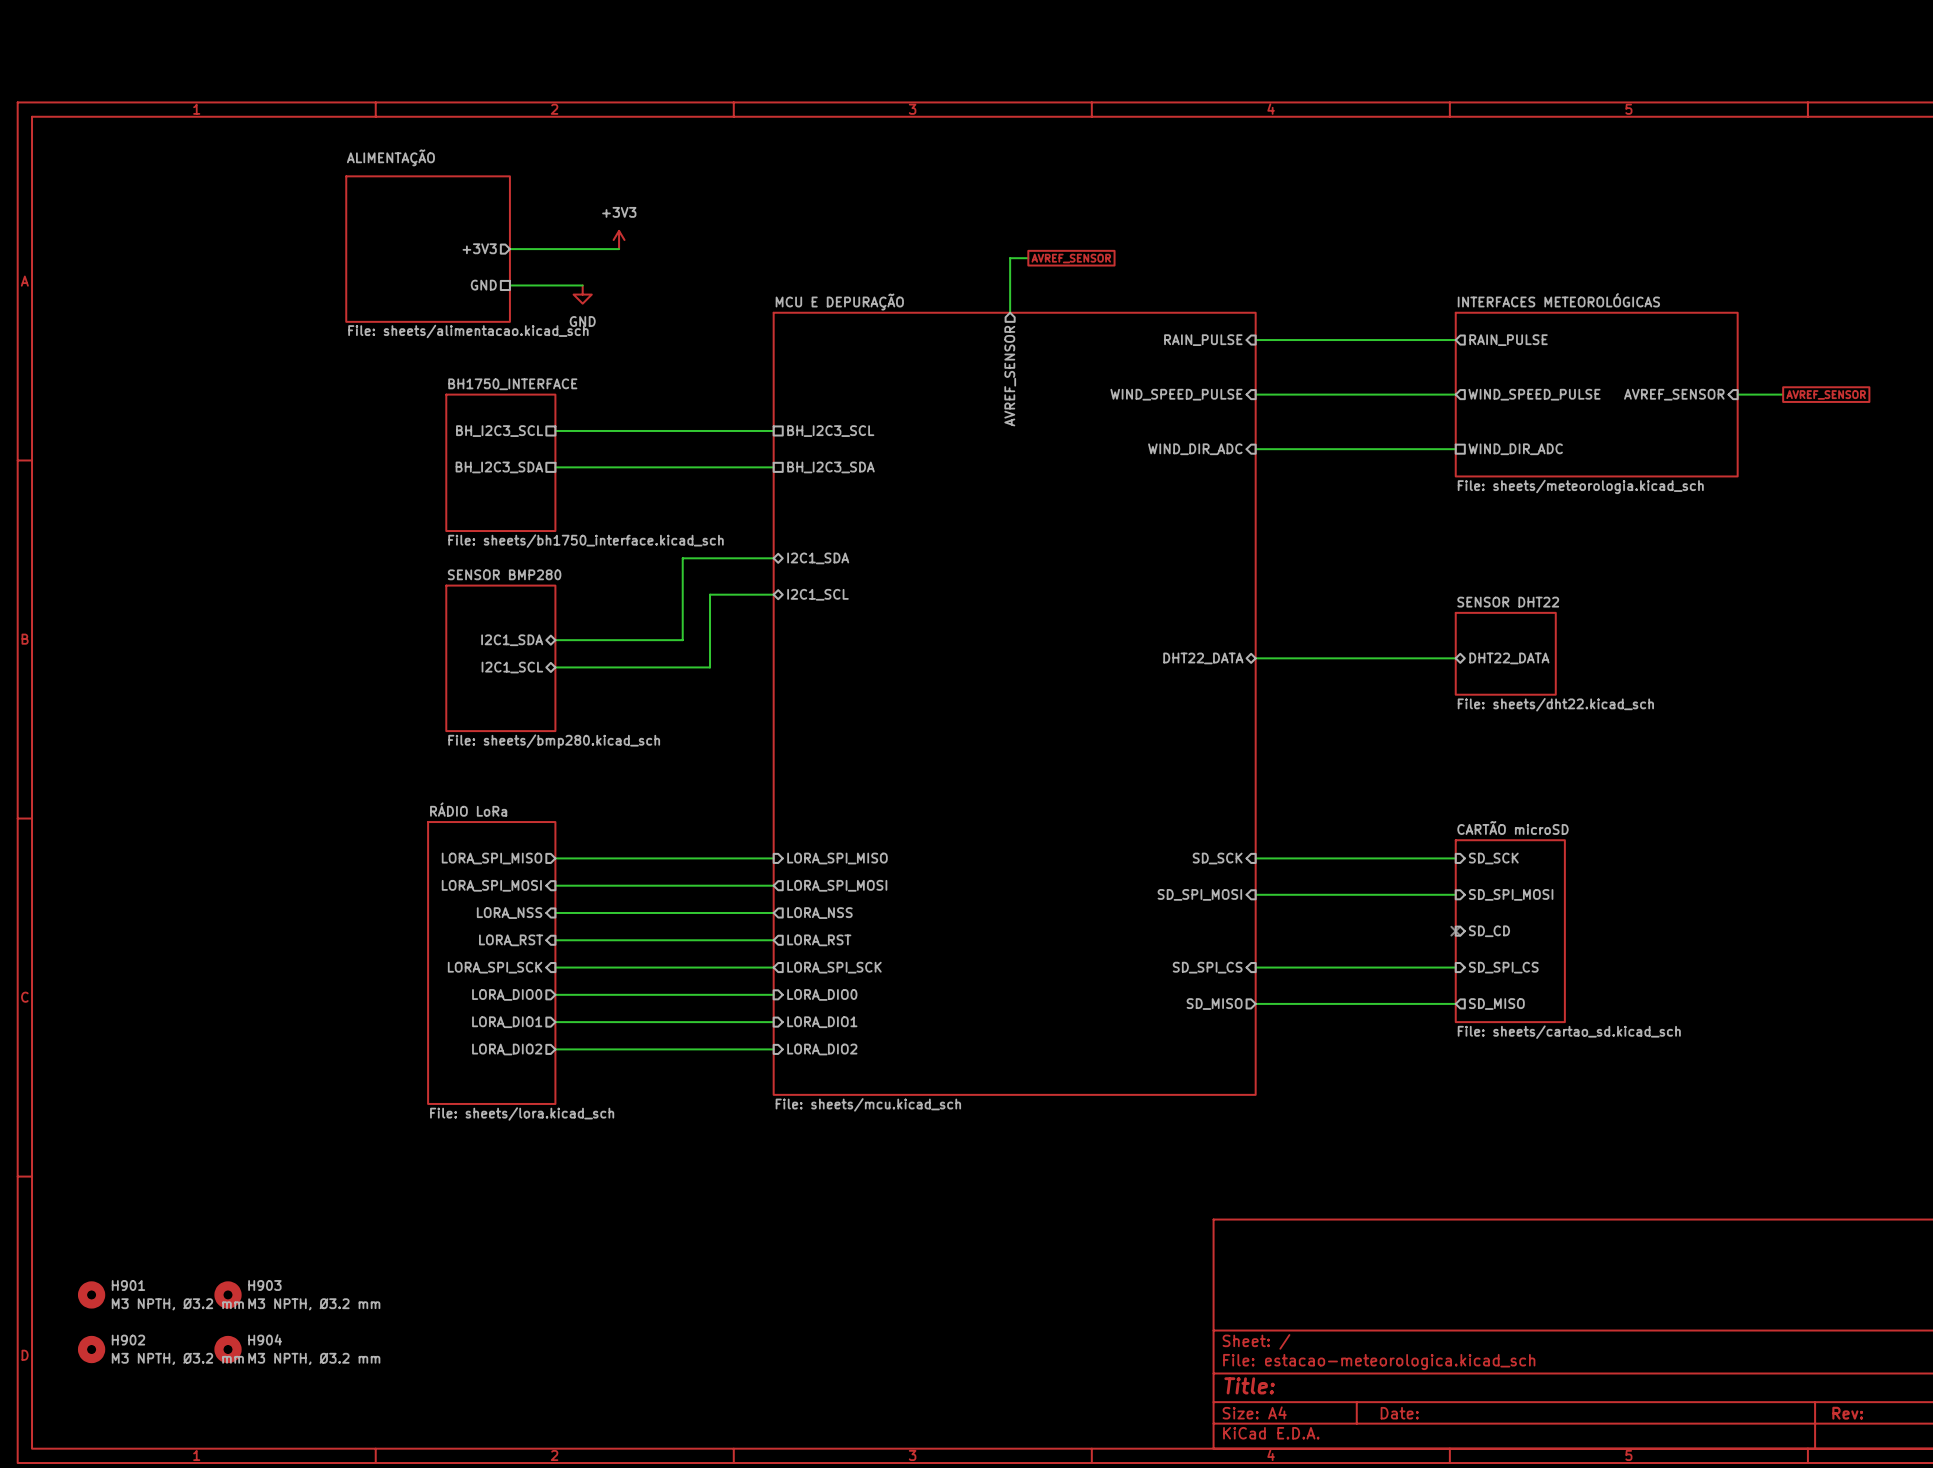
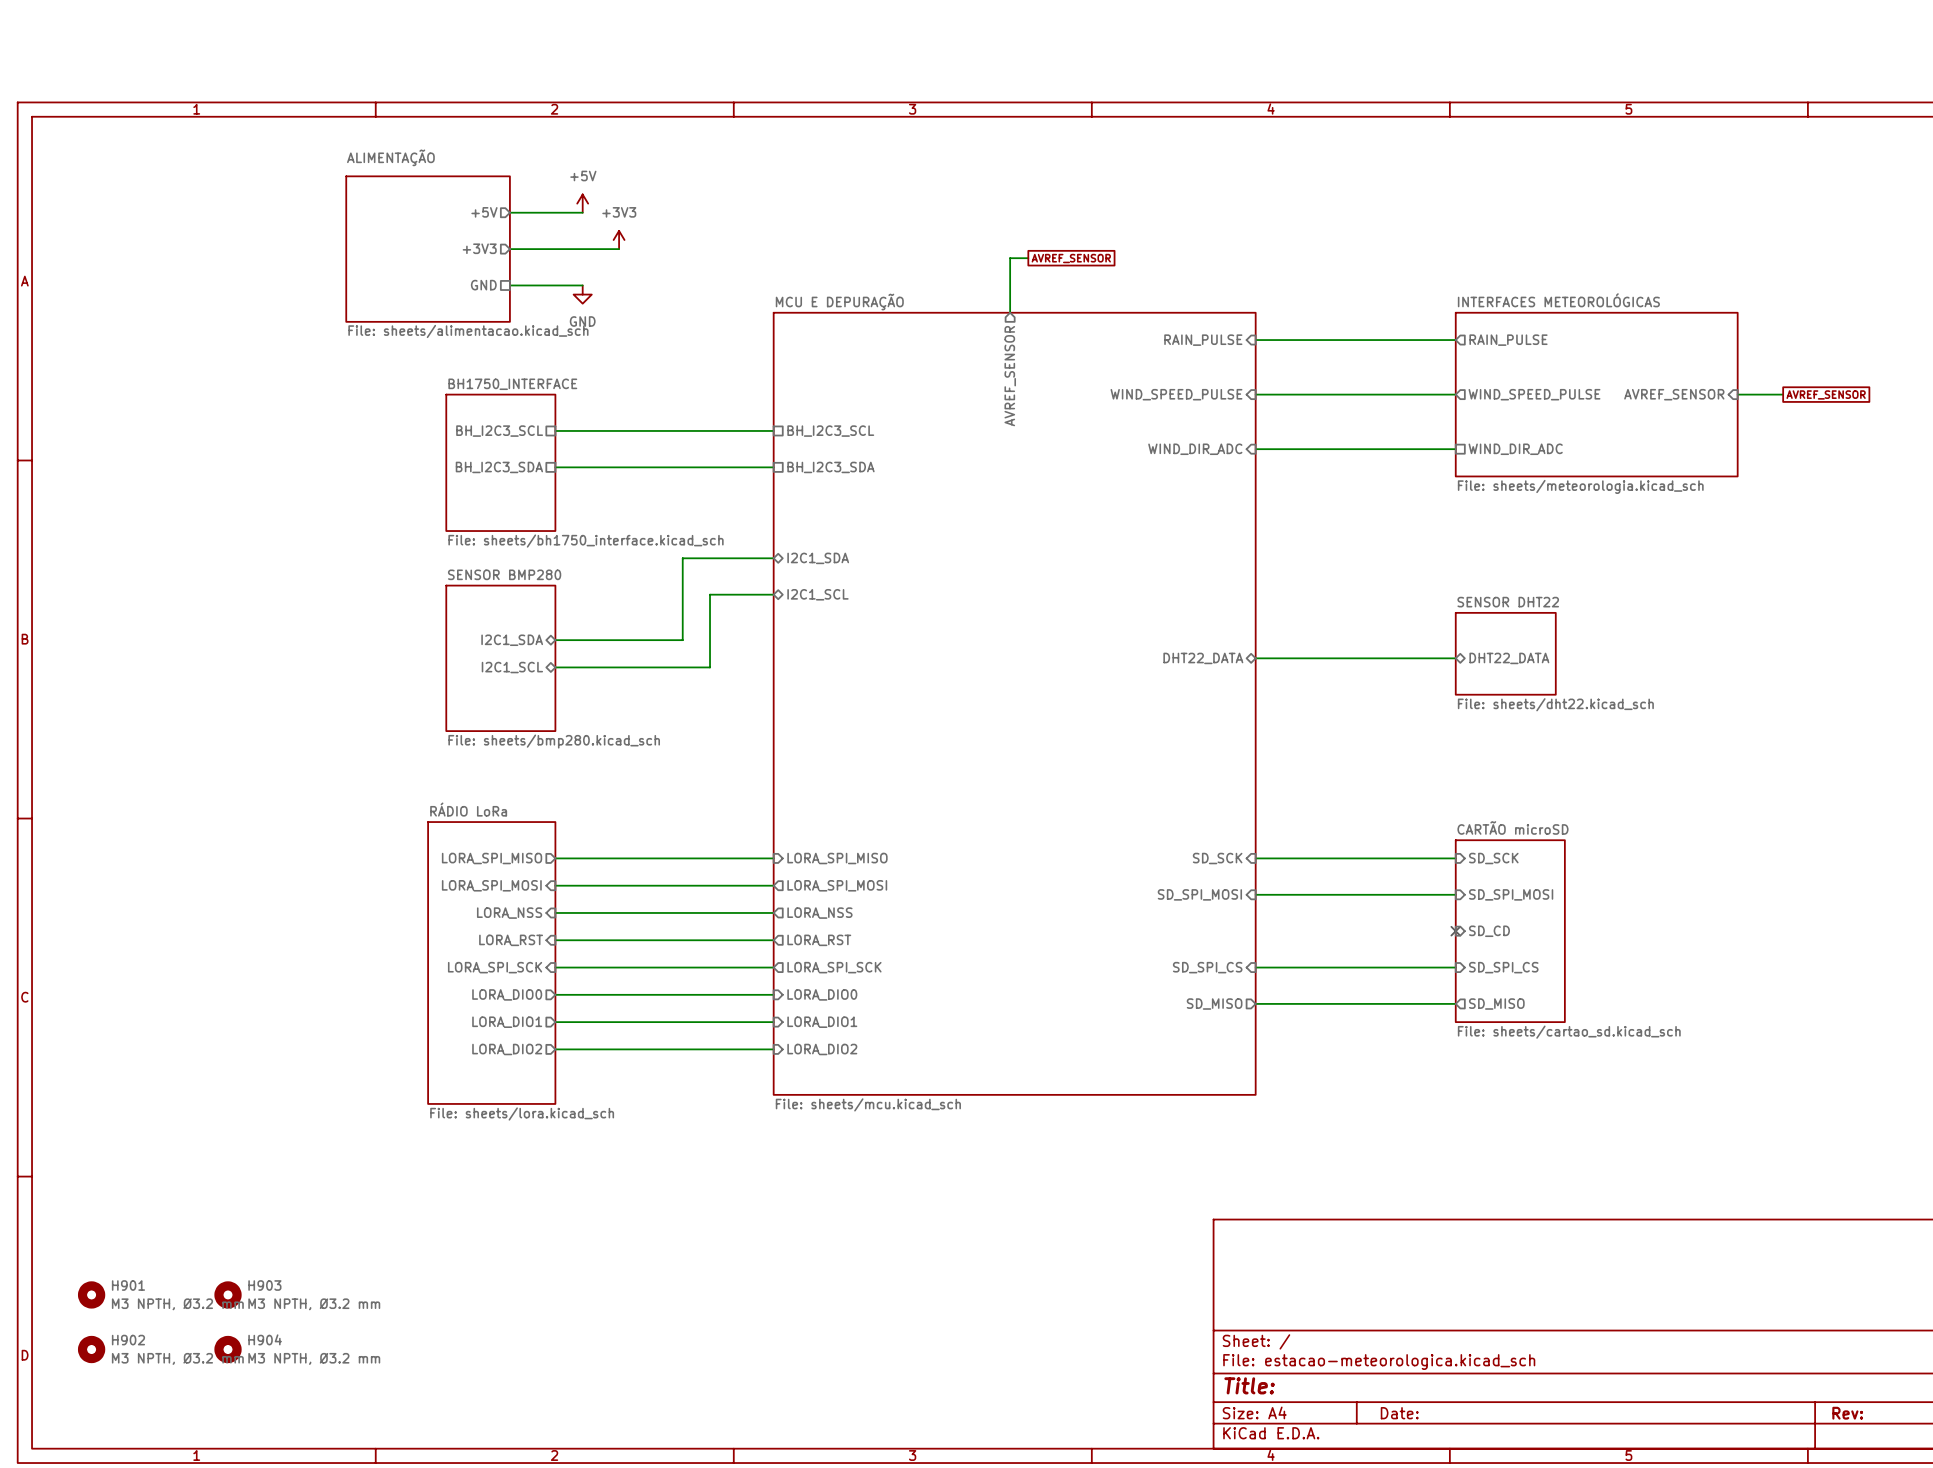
power symbol: none -> +5V (582, 203)
sheet pin: none -> +5V (484, 212)
wire: none -> (509, 212) (582, 212)

